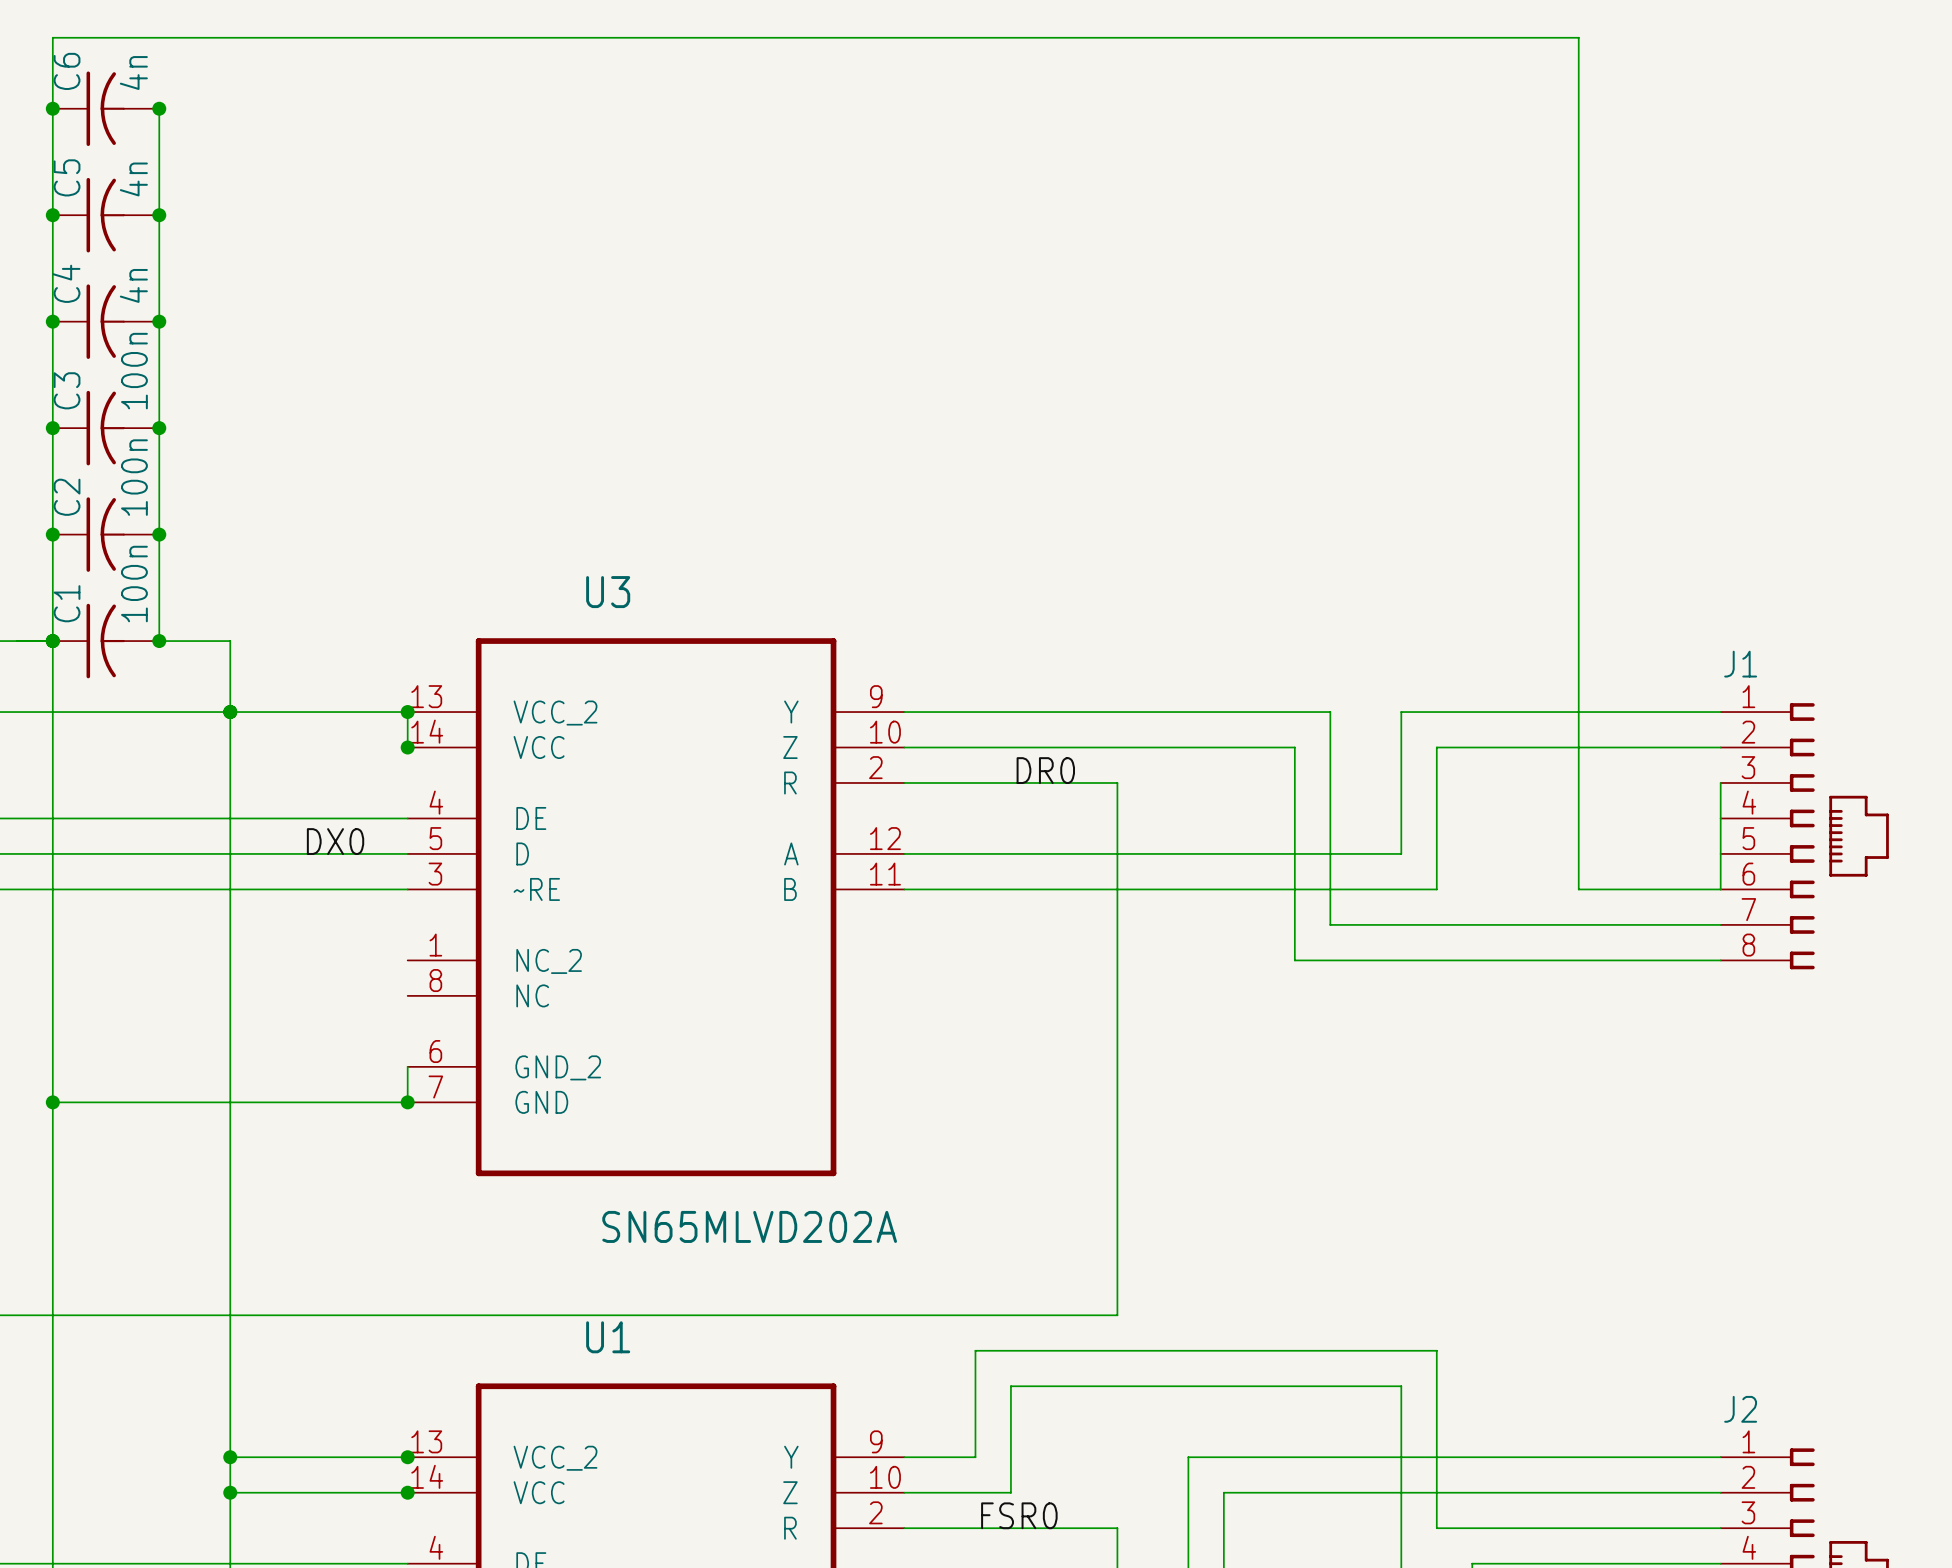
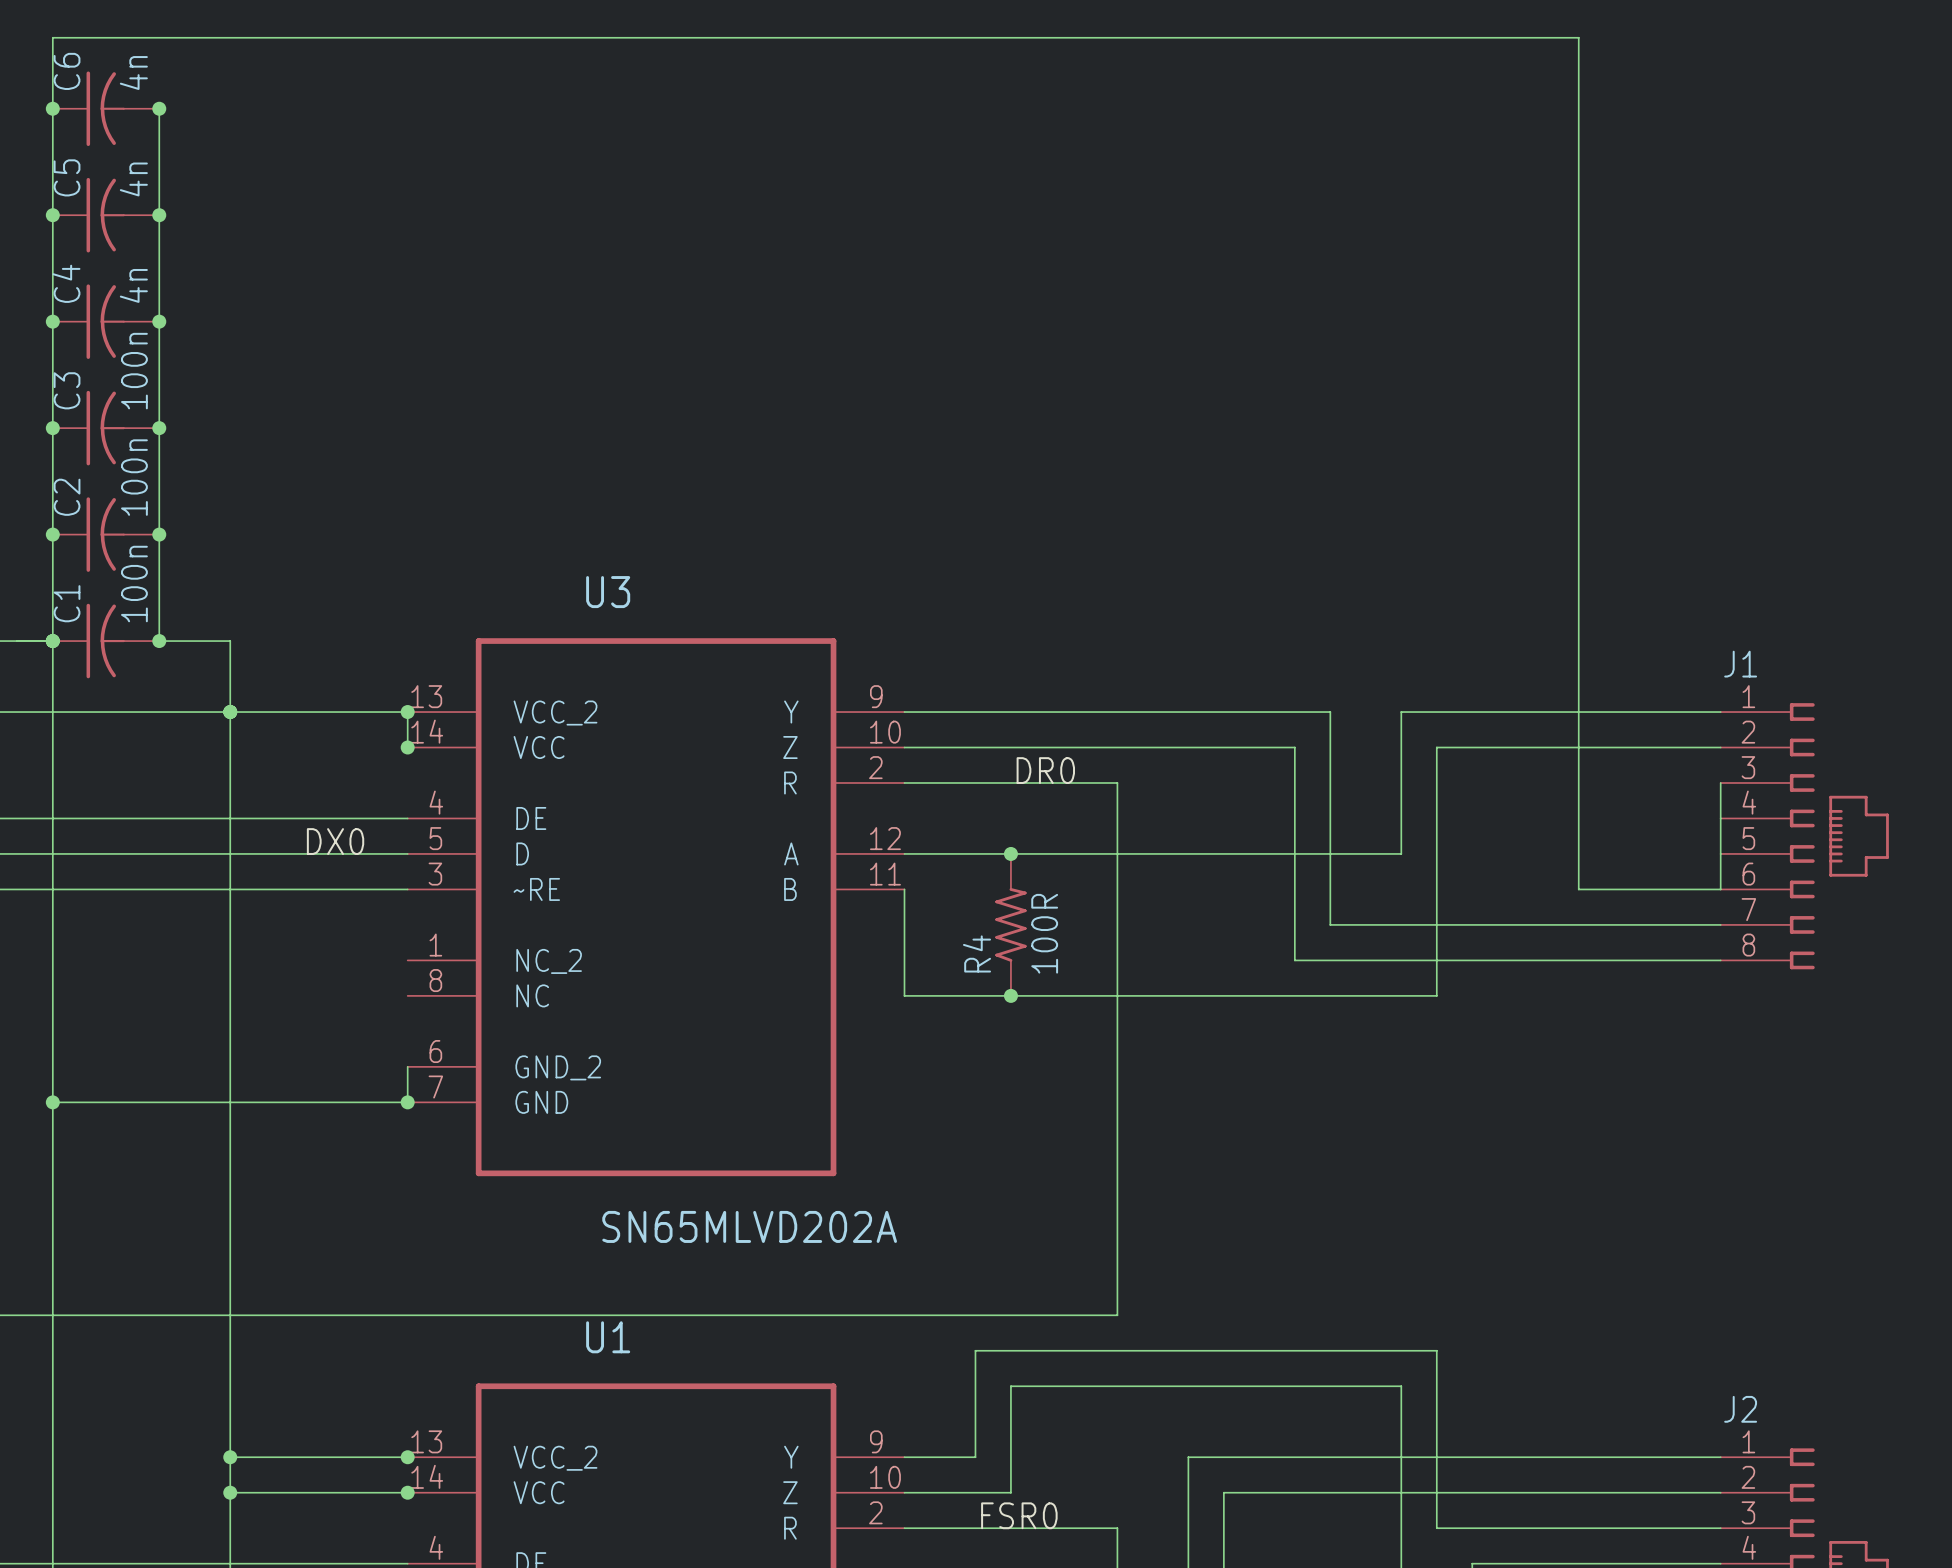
junction: none -> (1010, 853)
wire: (904, 889) (1436, 889) -> (904, 889) (904, 995) (1436, 995) (1436, 889)
R4: none -> 100R (1010, 924)
junction: none -> (1010, 995)

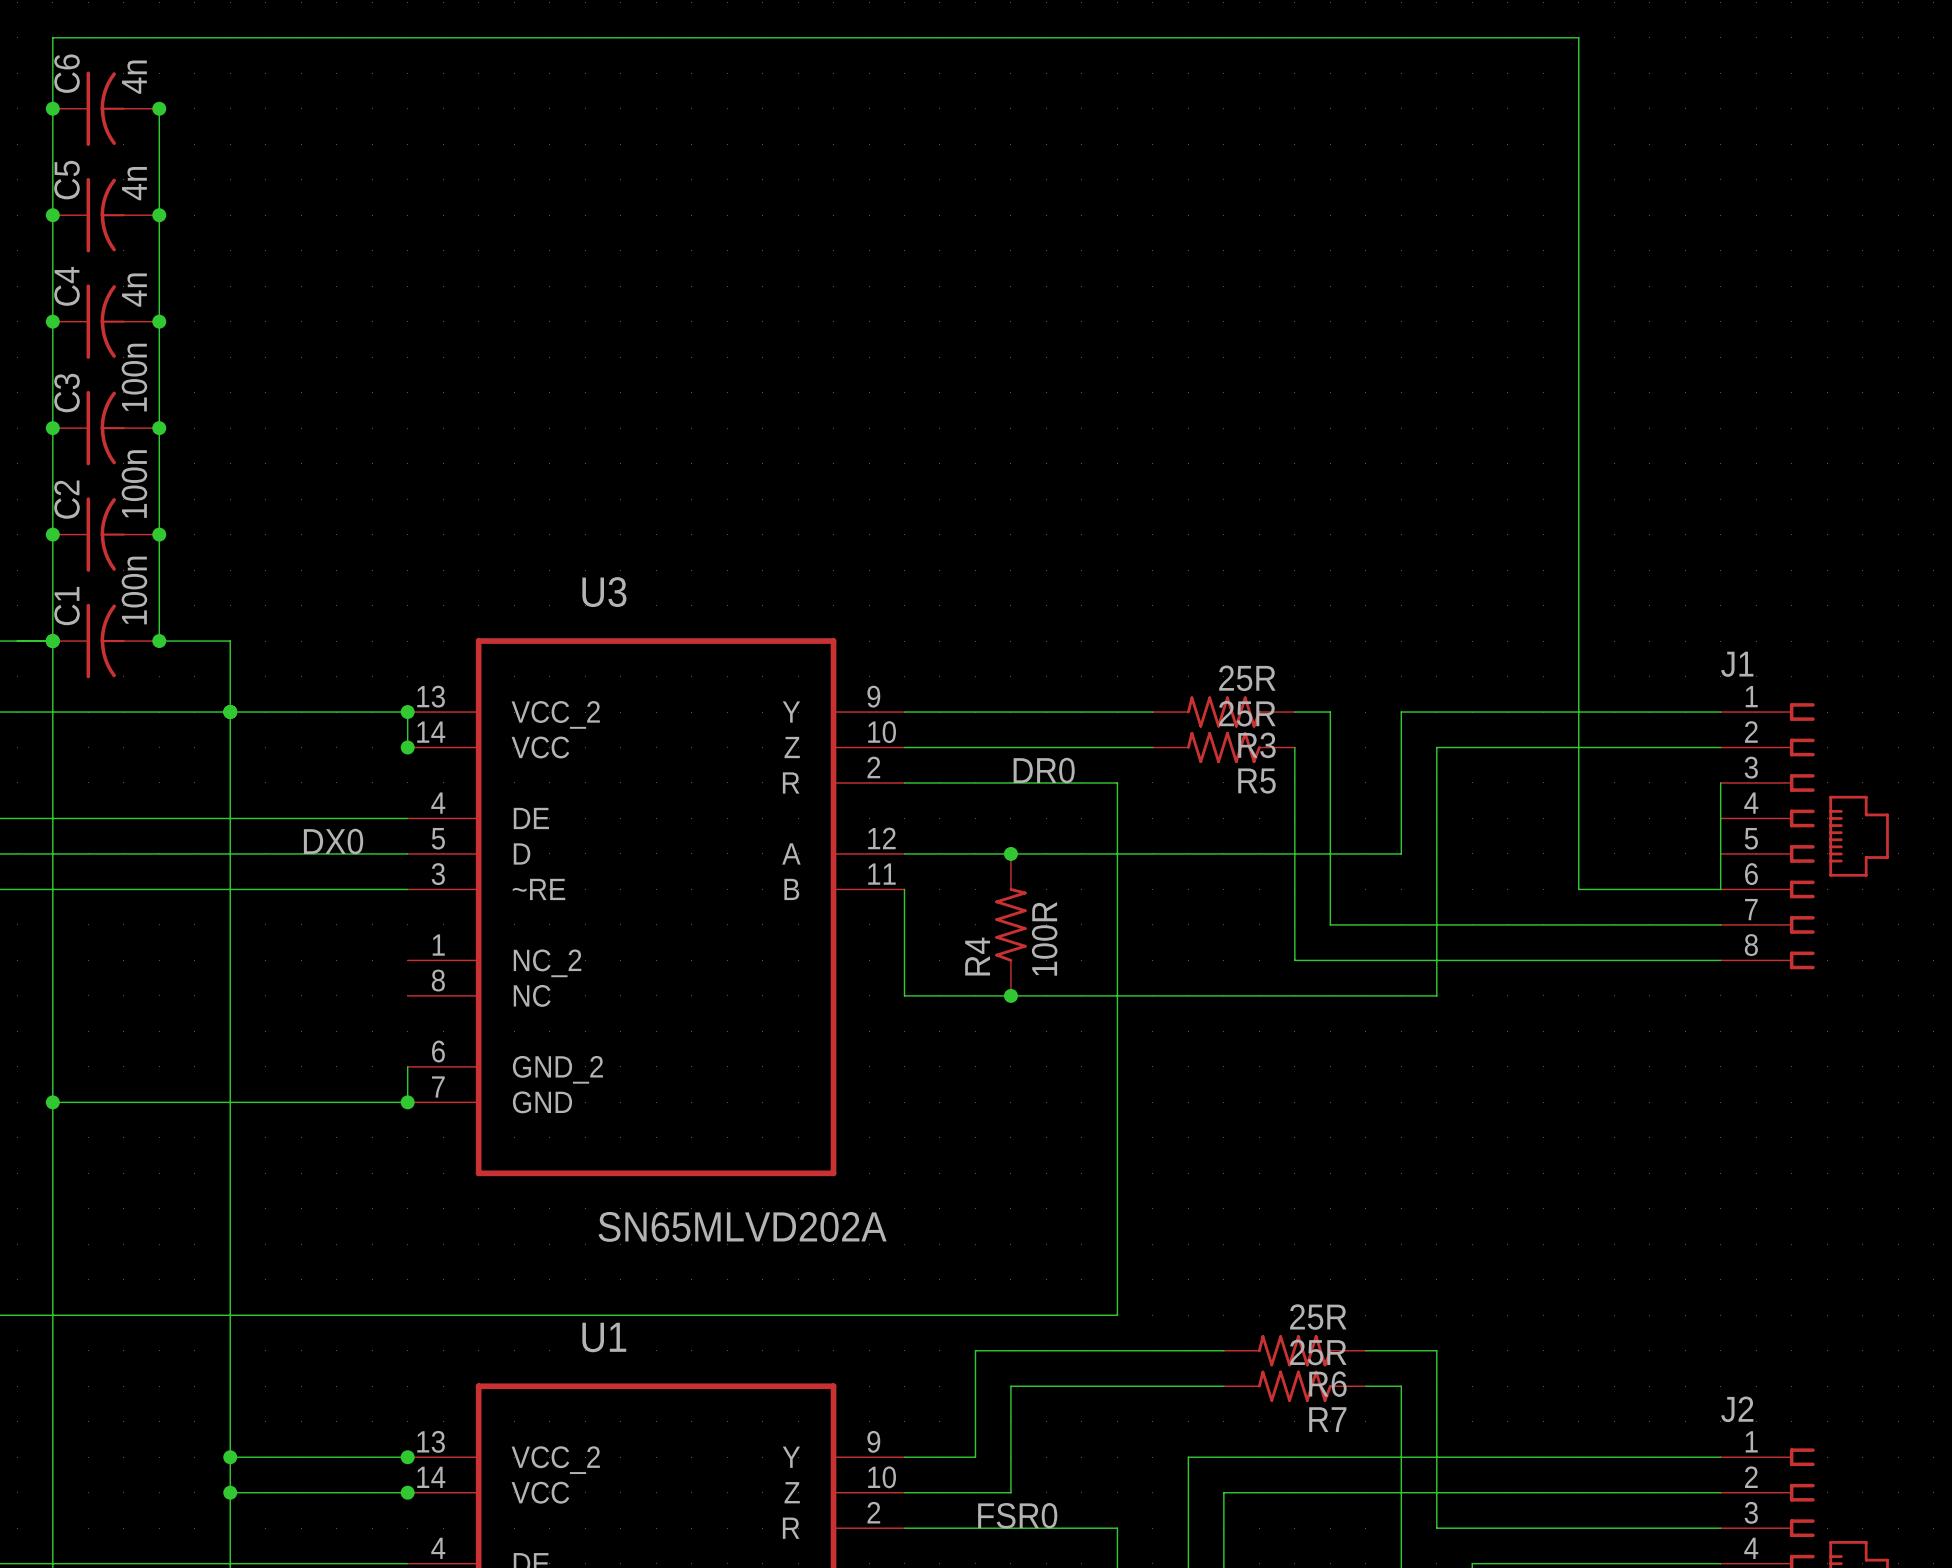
R3: none -> 25R (1223, 712)
R5: none -> 25R (1223, 747)
R6: none -> 25R (1294, 1350)
R7: none -> 25R (1294, 1386)

